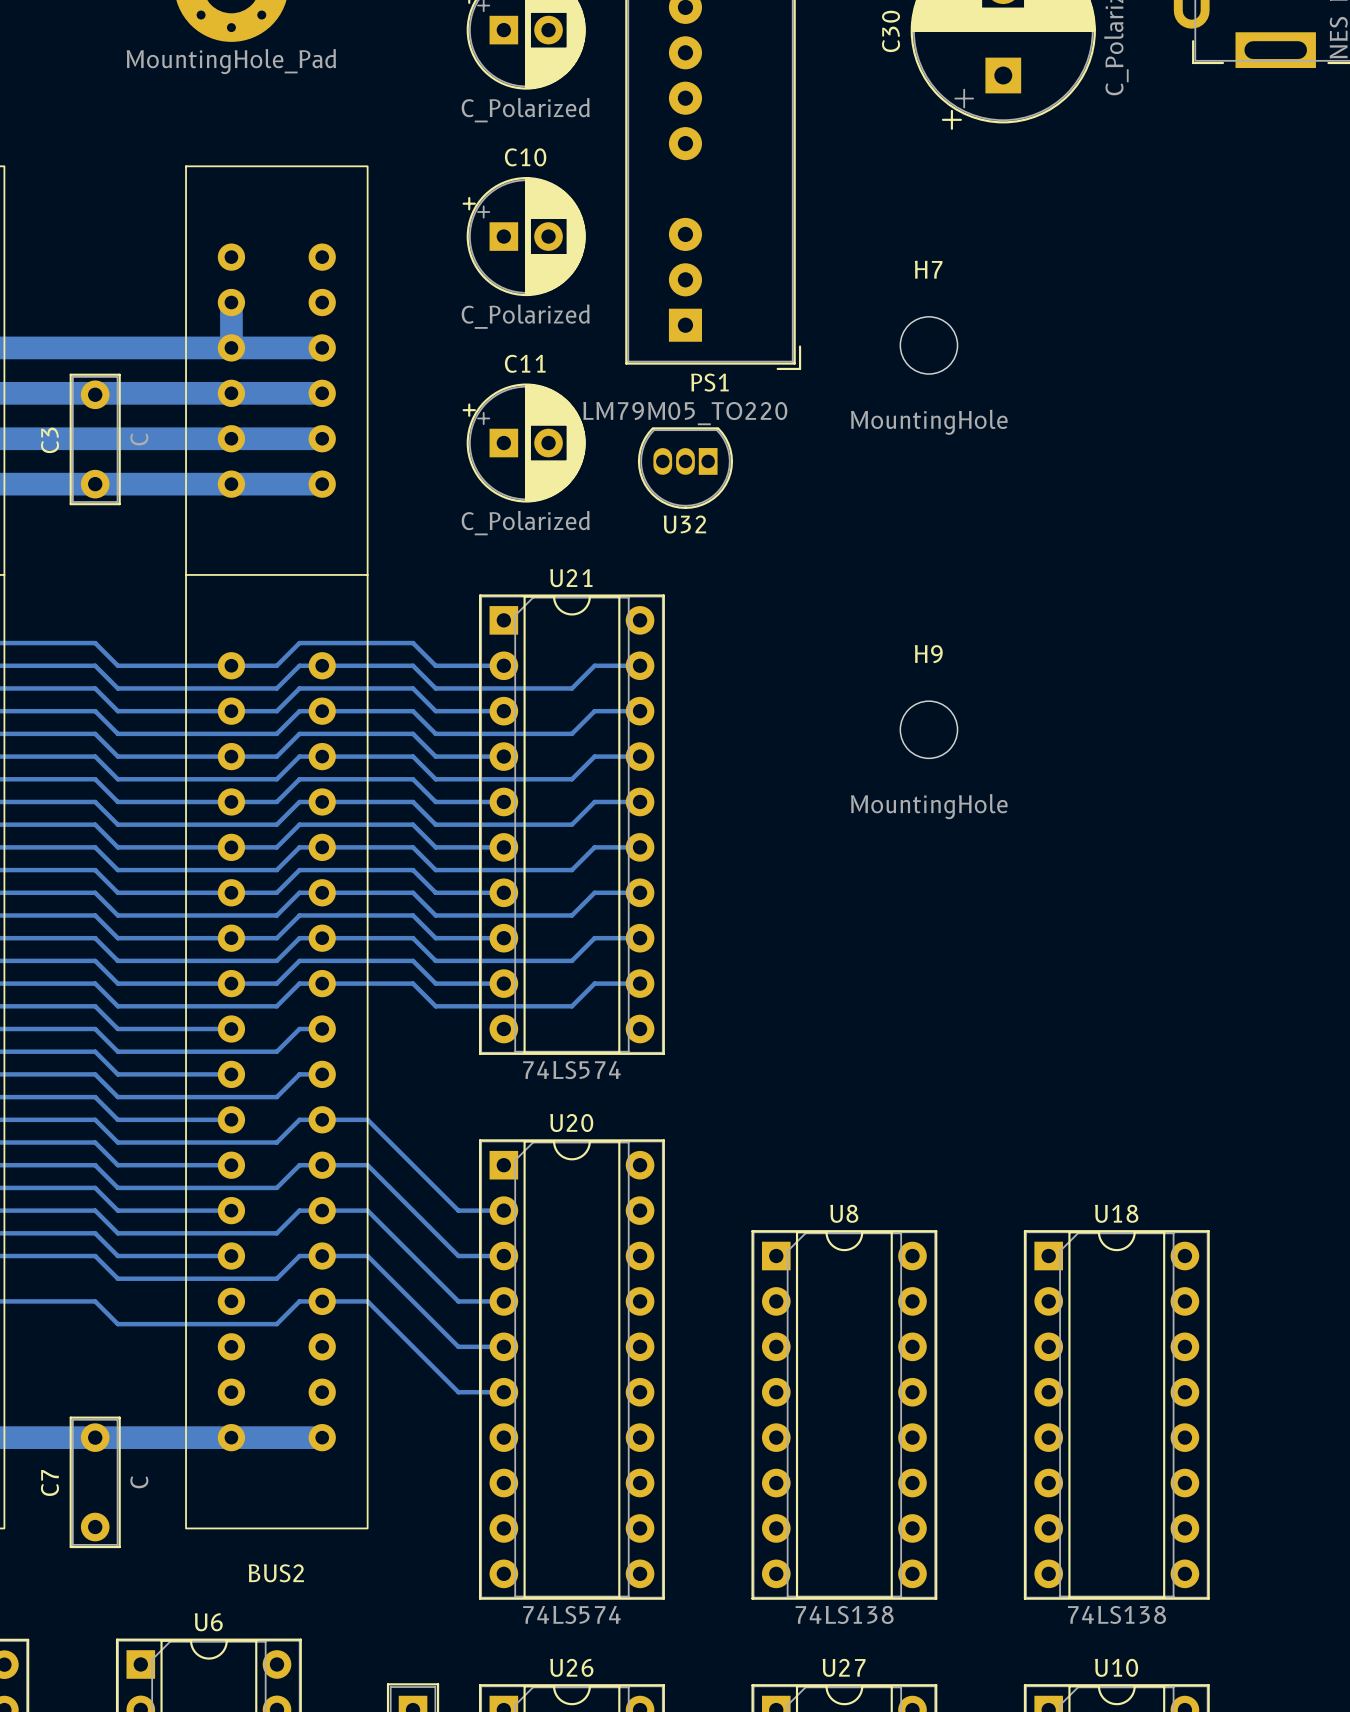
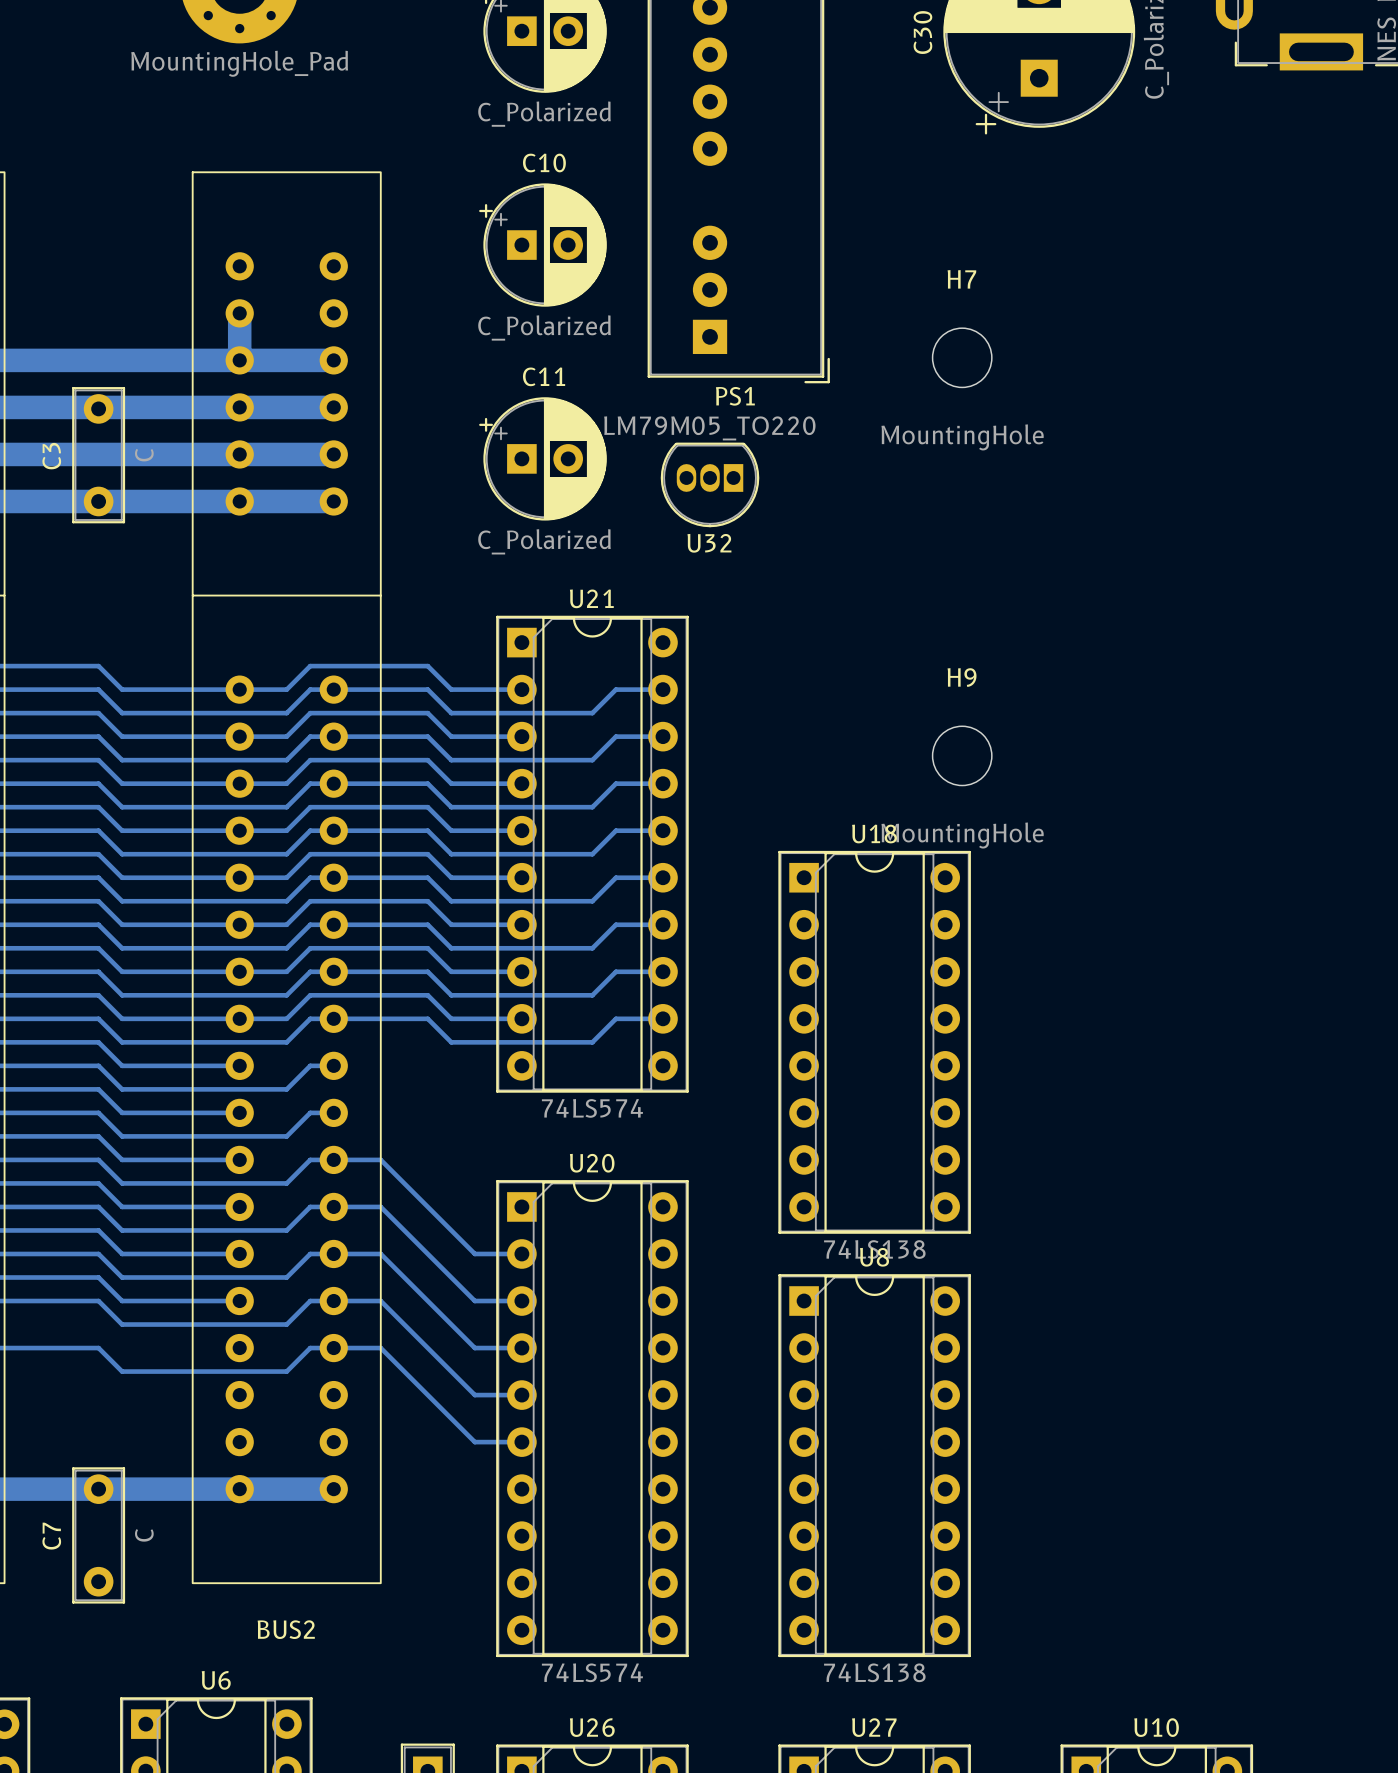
U18 position: (1116, 1414) -> (874, 1042)

